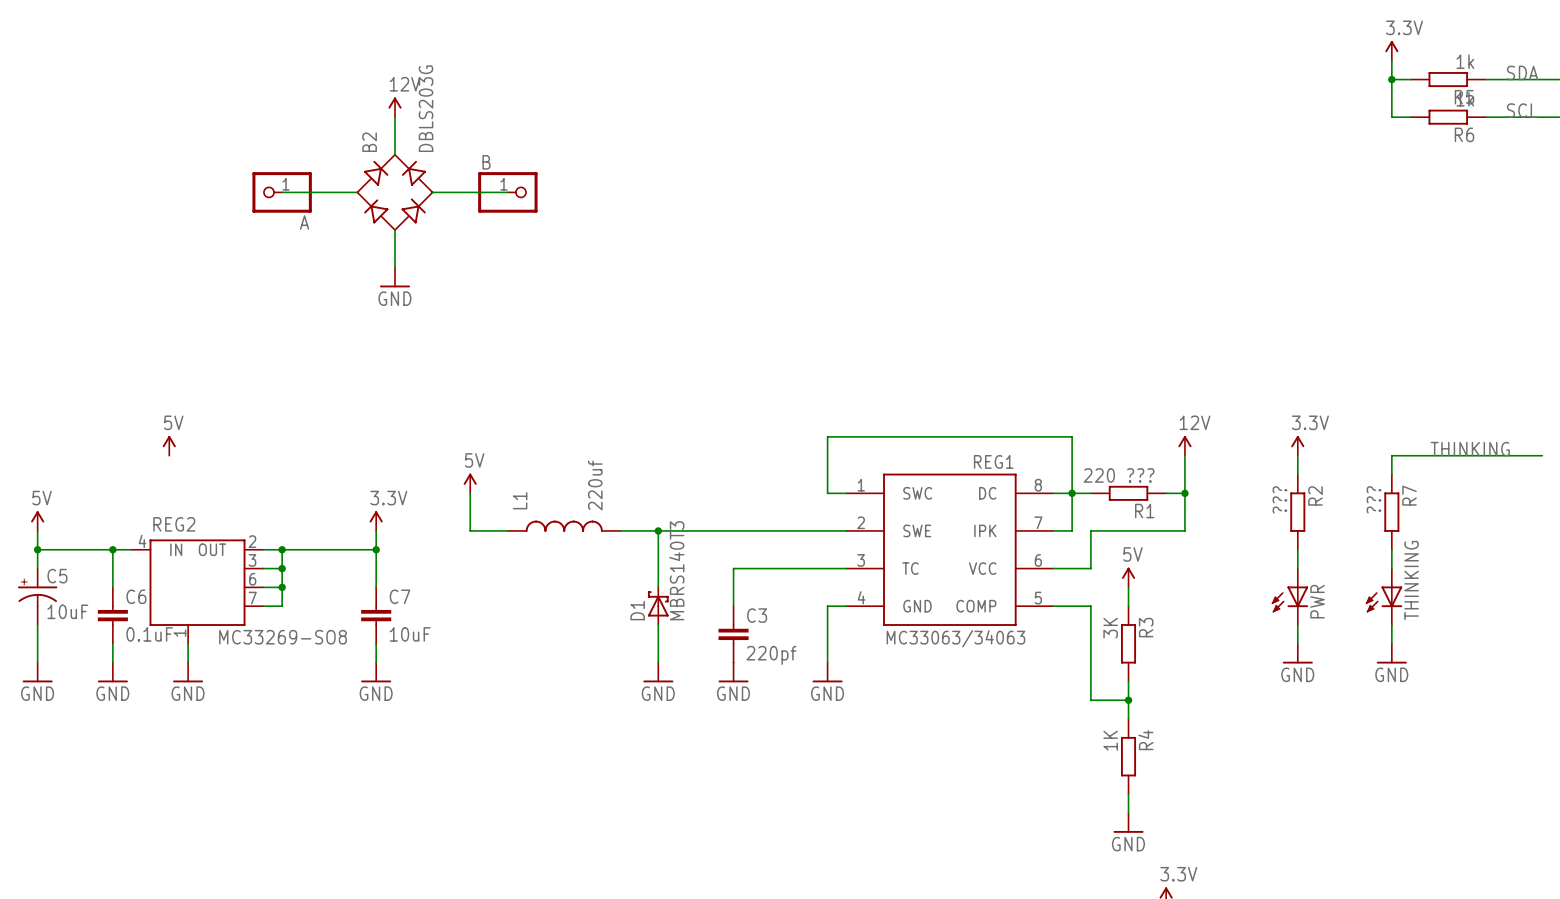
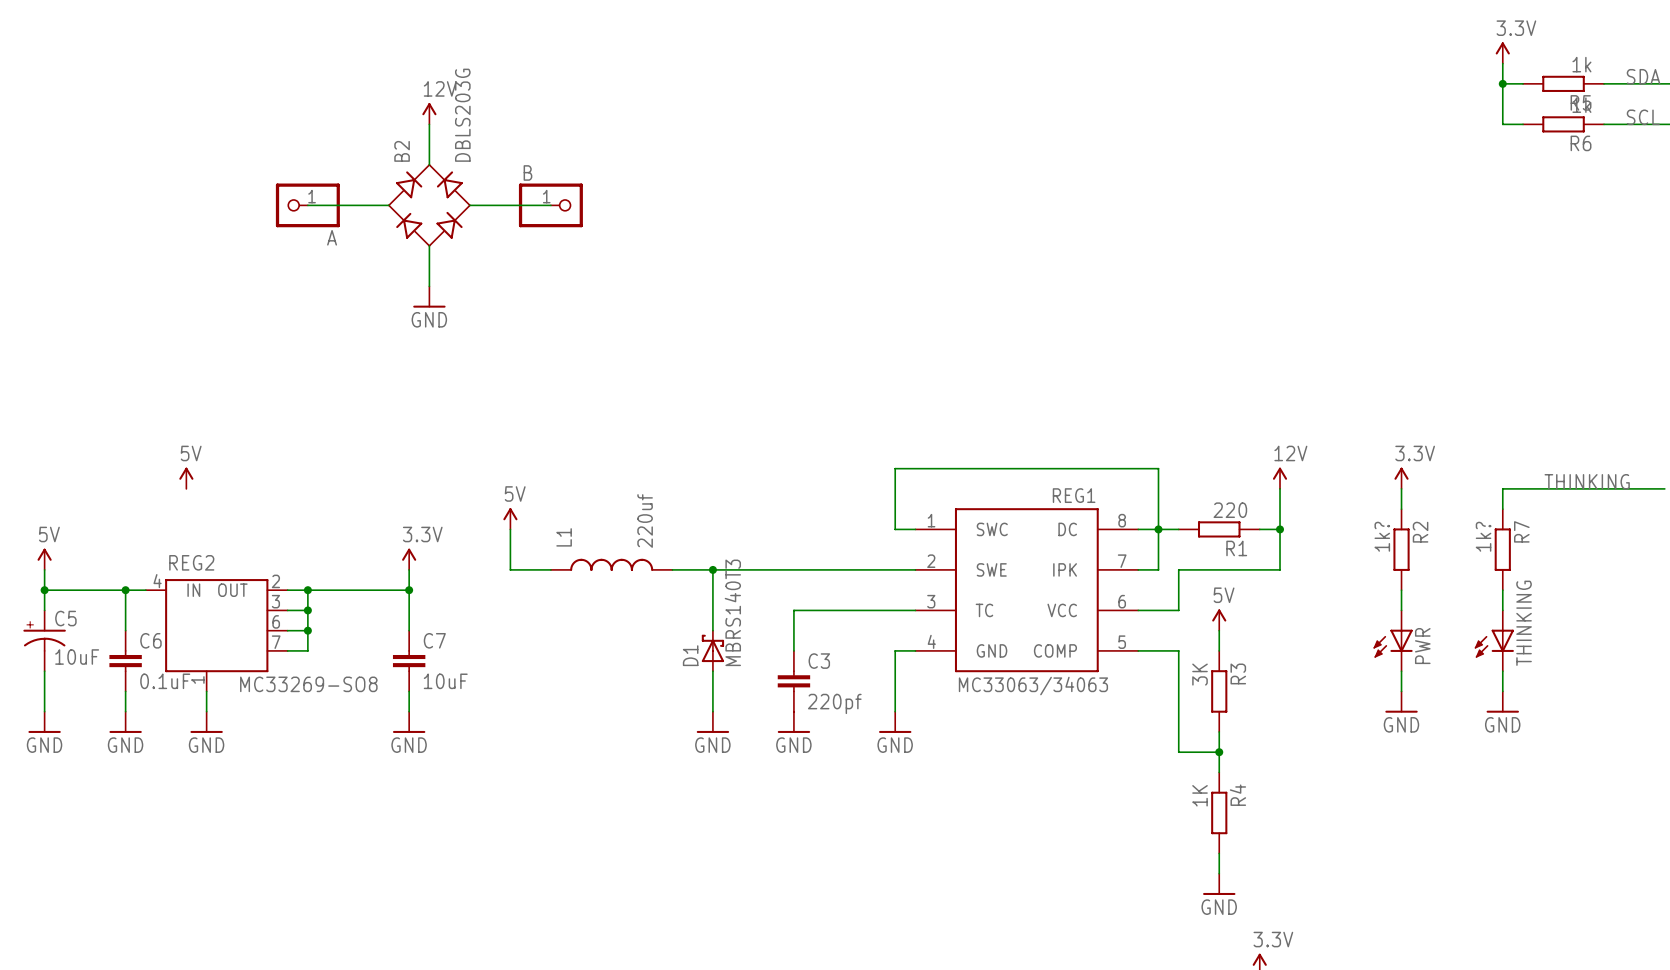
R1 value: 220 ??? (1119, 475) -> 220 (1230, 510)
R2 value: ??? (1279, 499) -> 1k? (1382, 536)
R7 value: ??? (1373, 499) -> 1k? (1483, 536)

